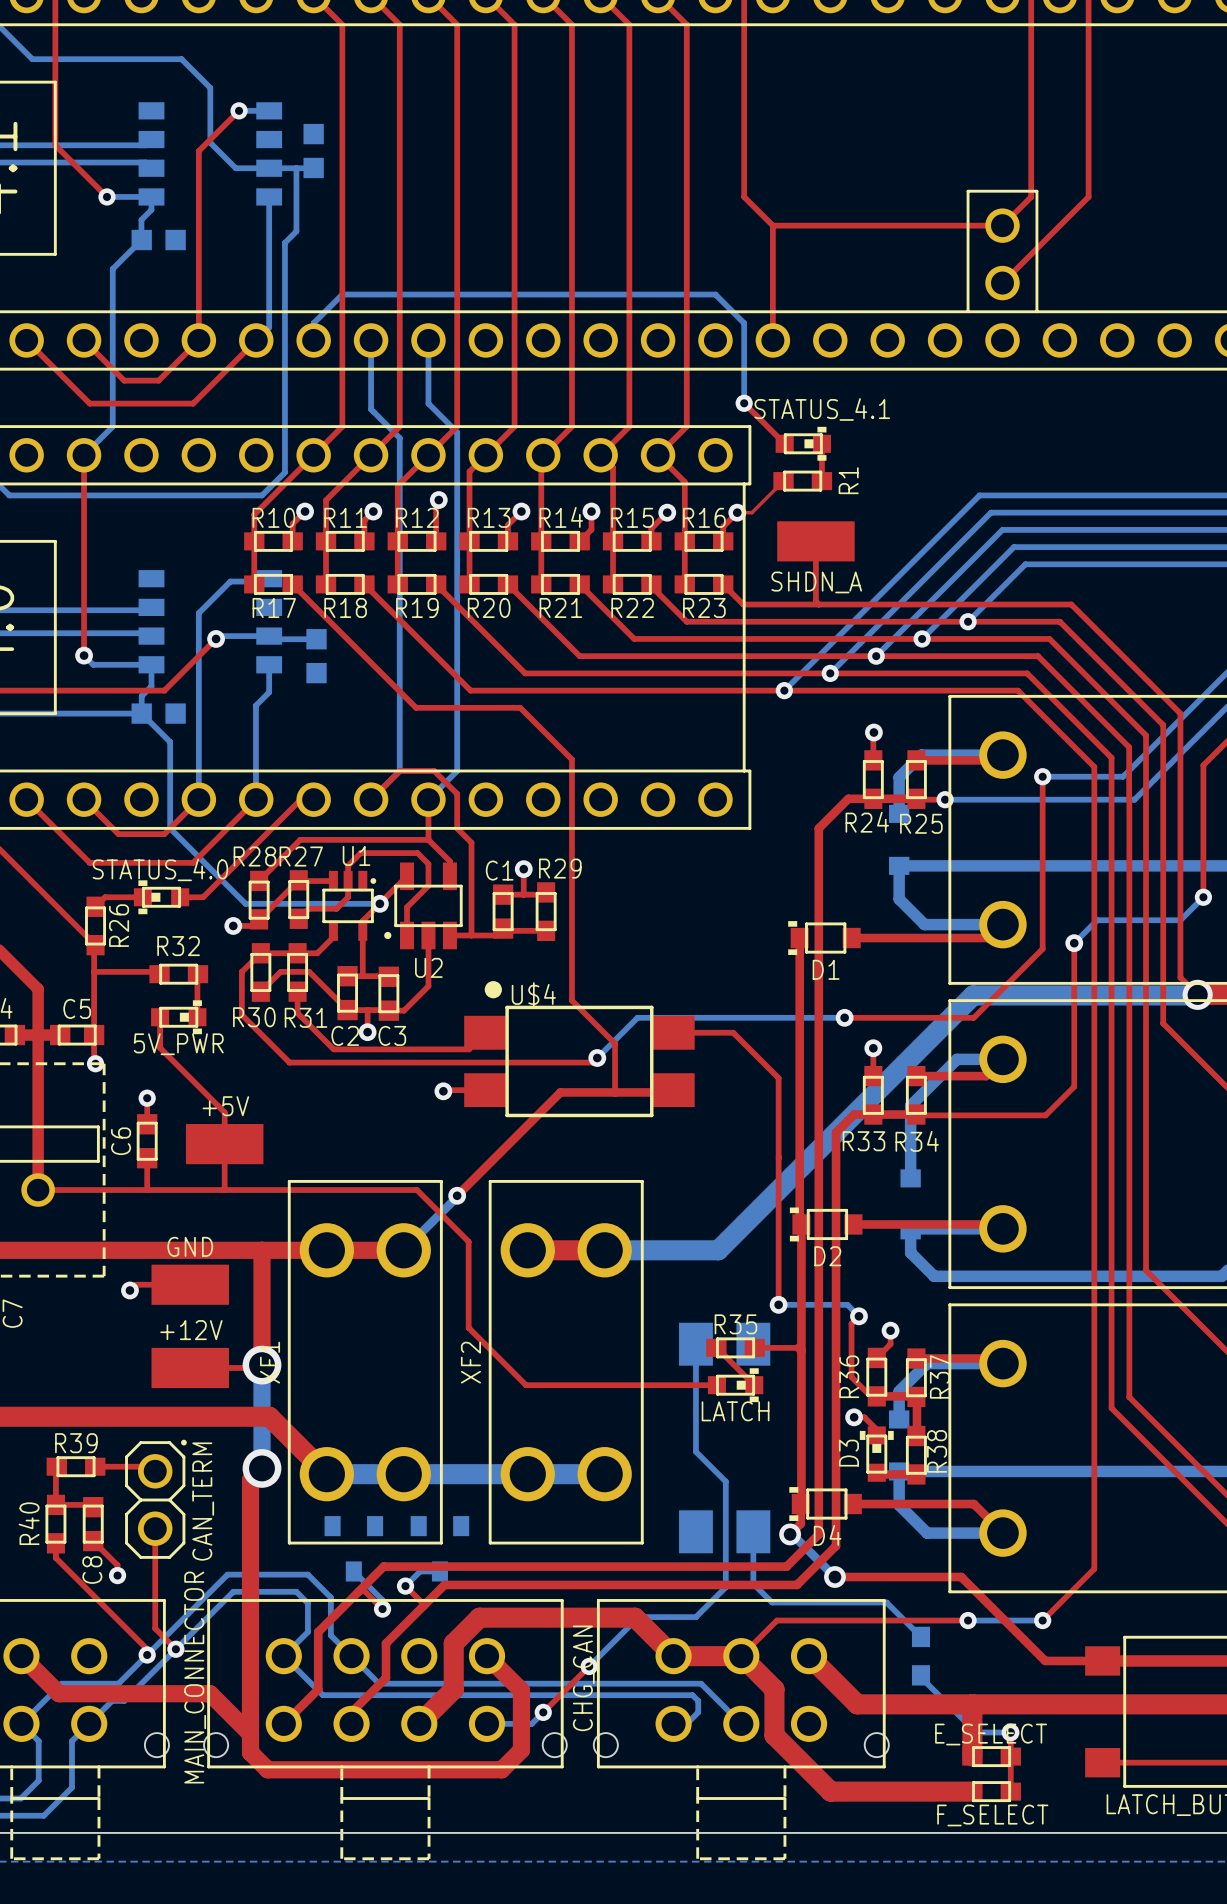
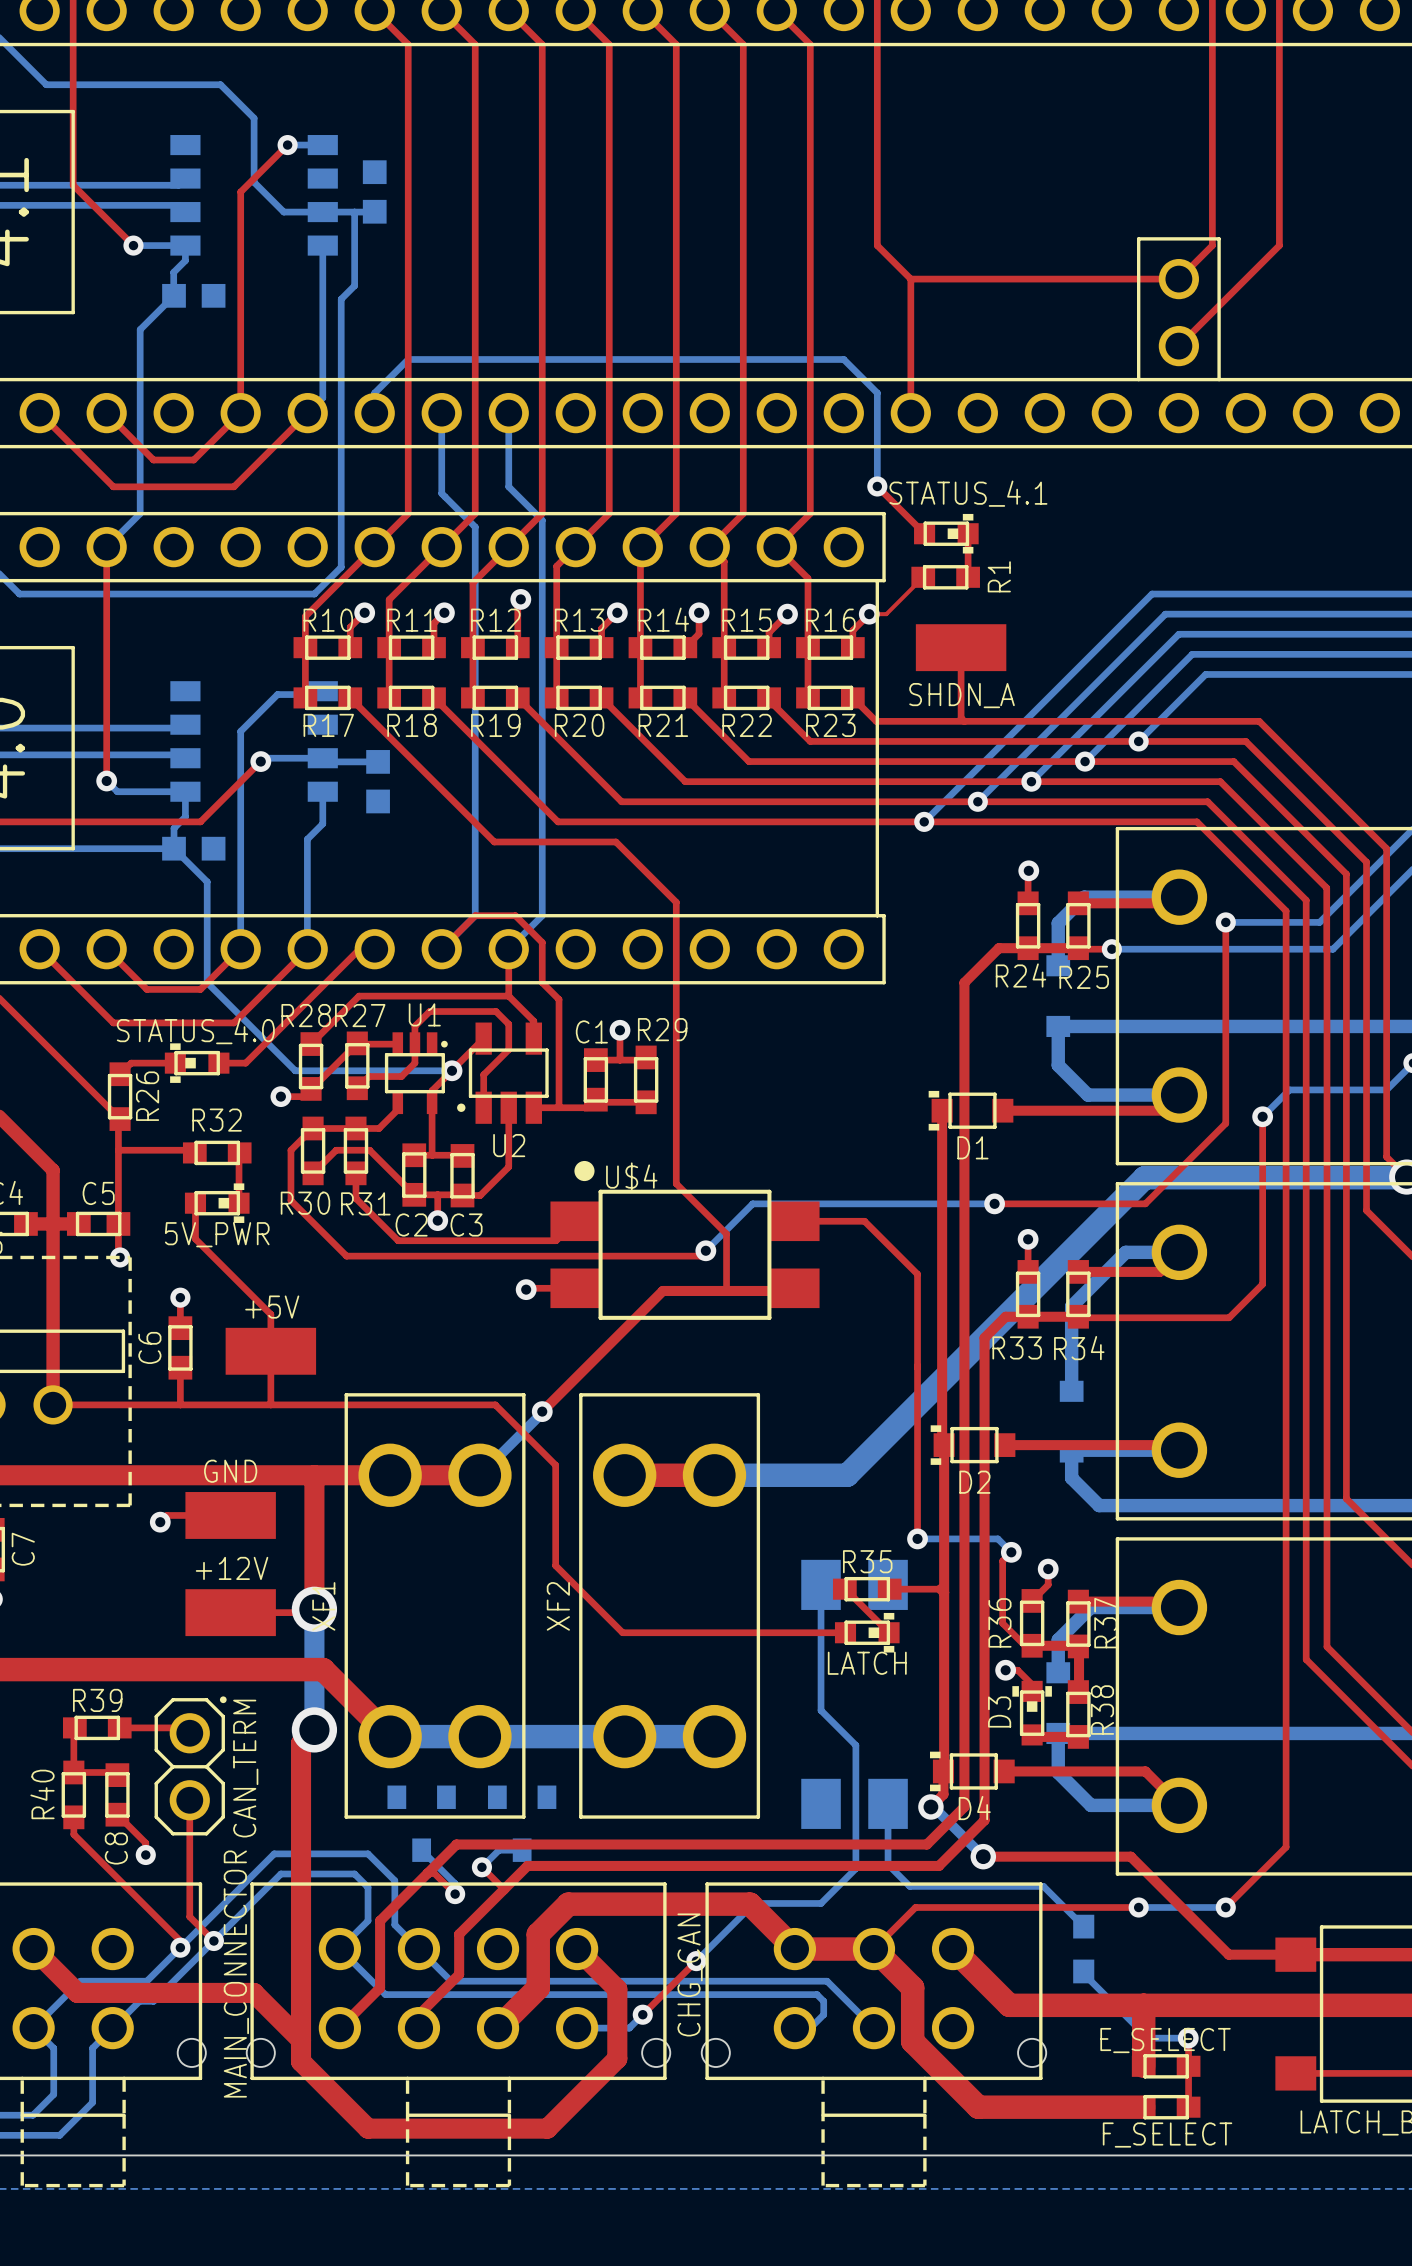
top track: (267, 1769) (501, 1769) -> (321, 2081) (368, 2128) (547, 2128) (594, 2081)

